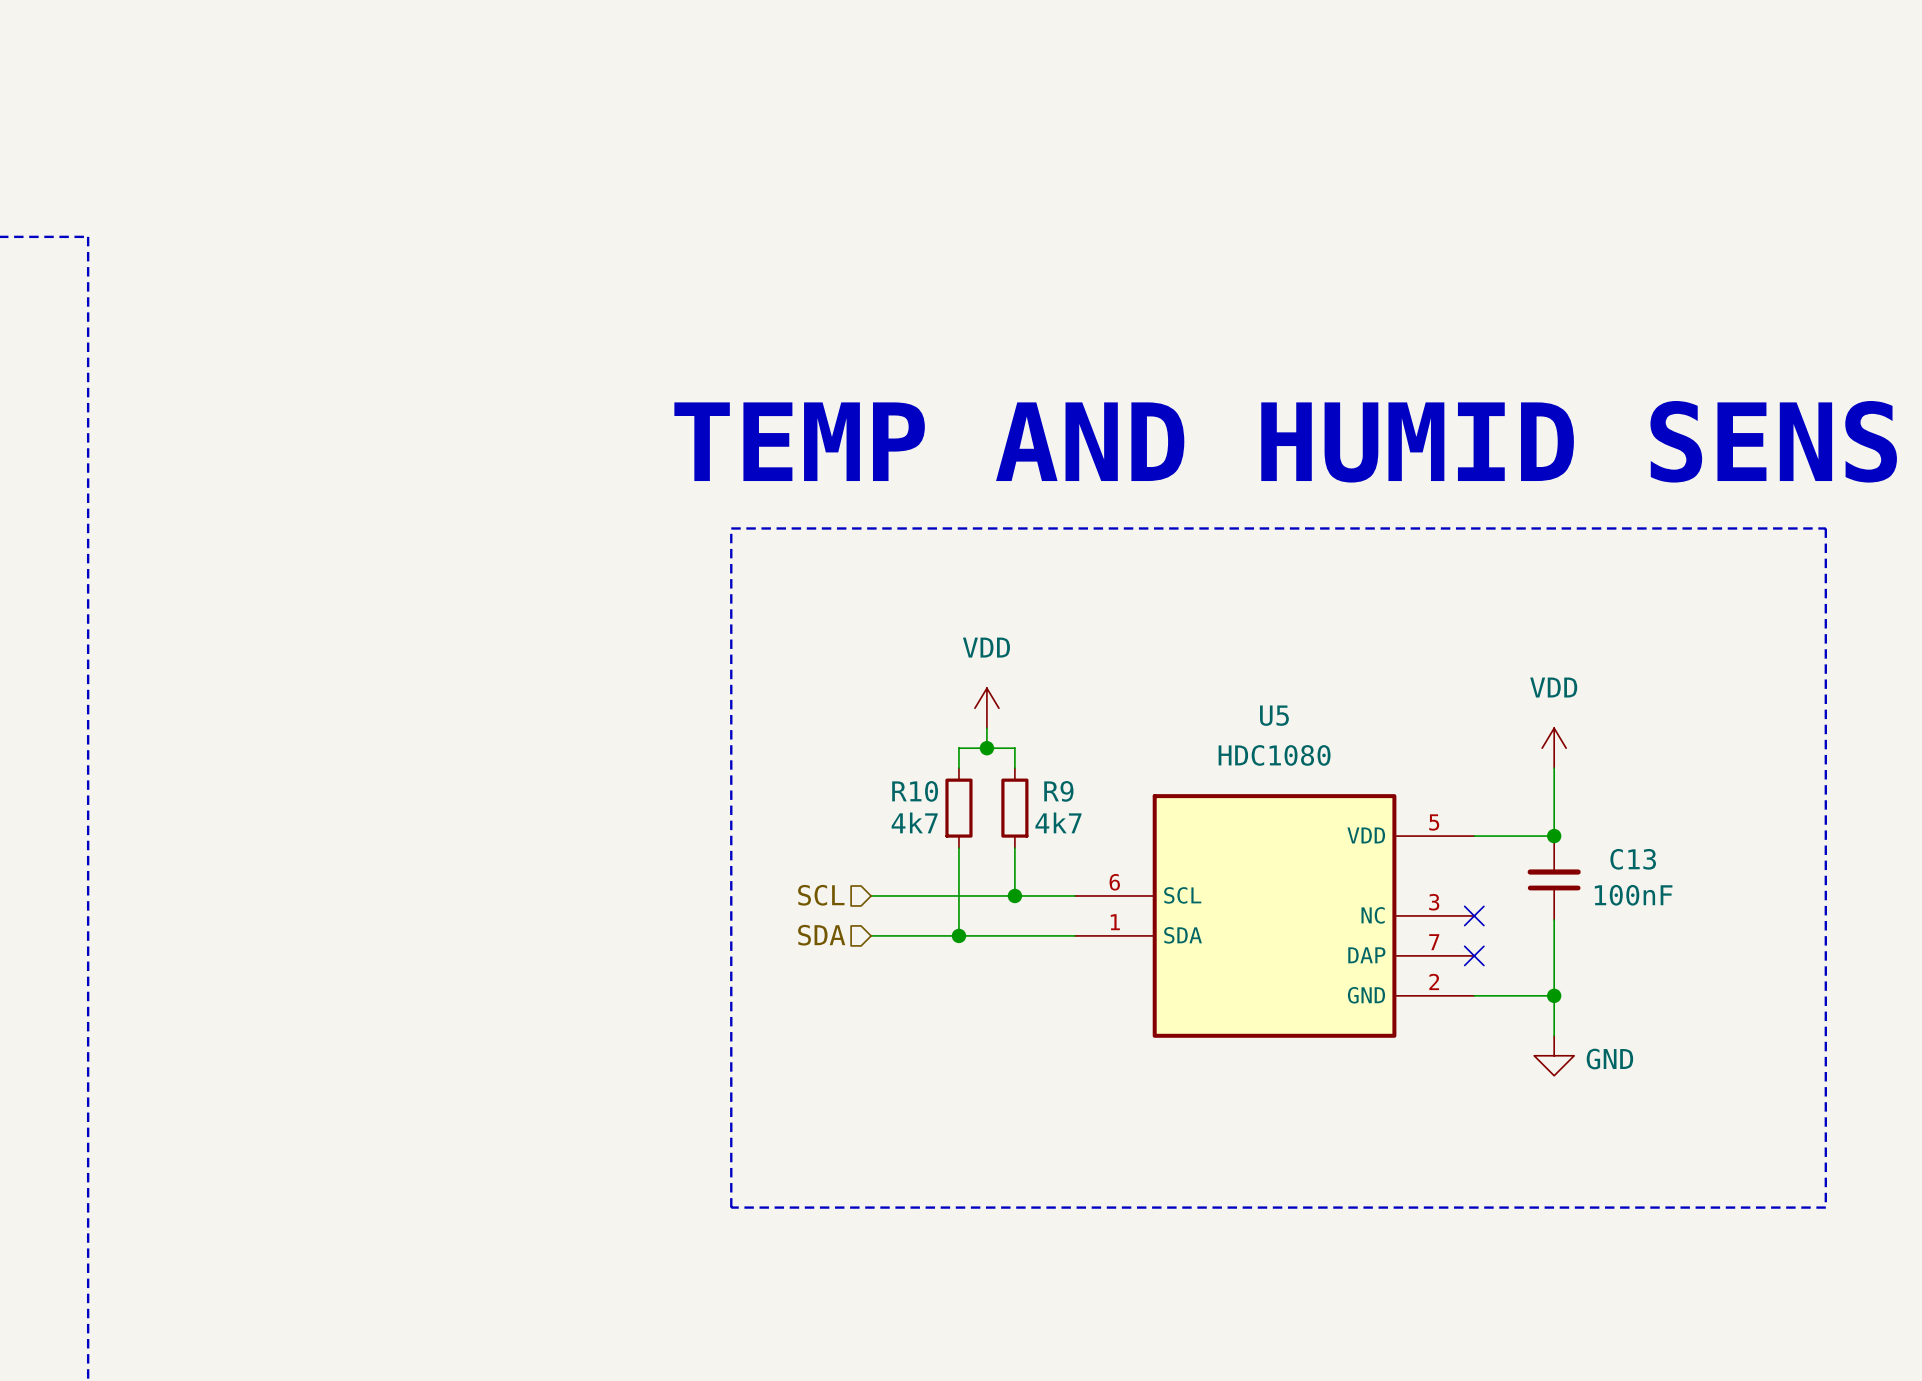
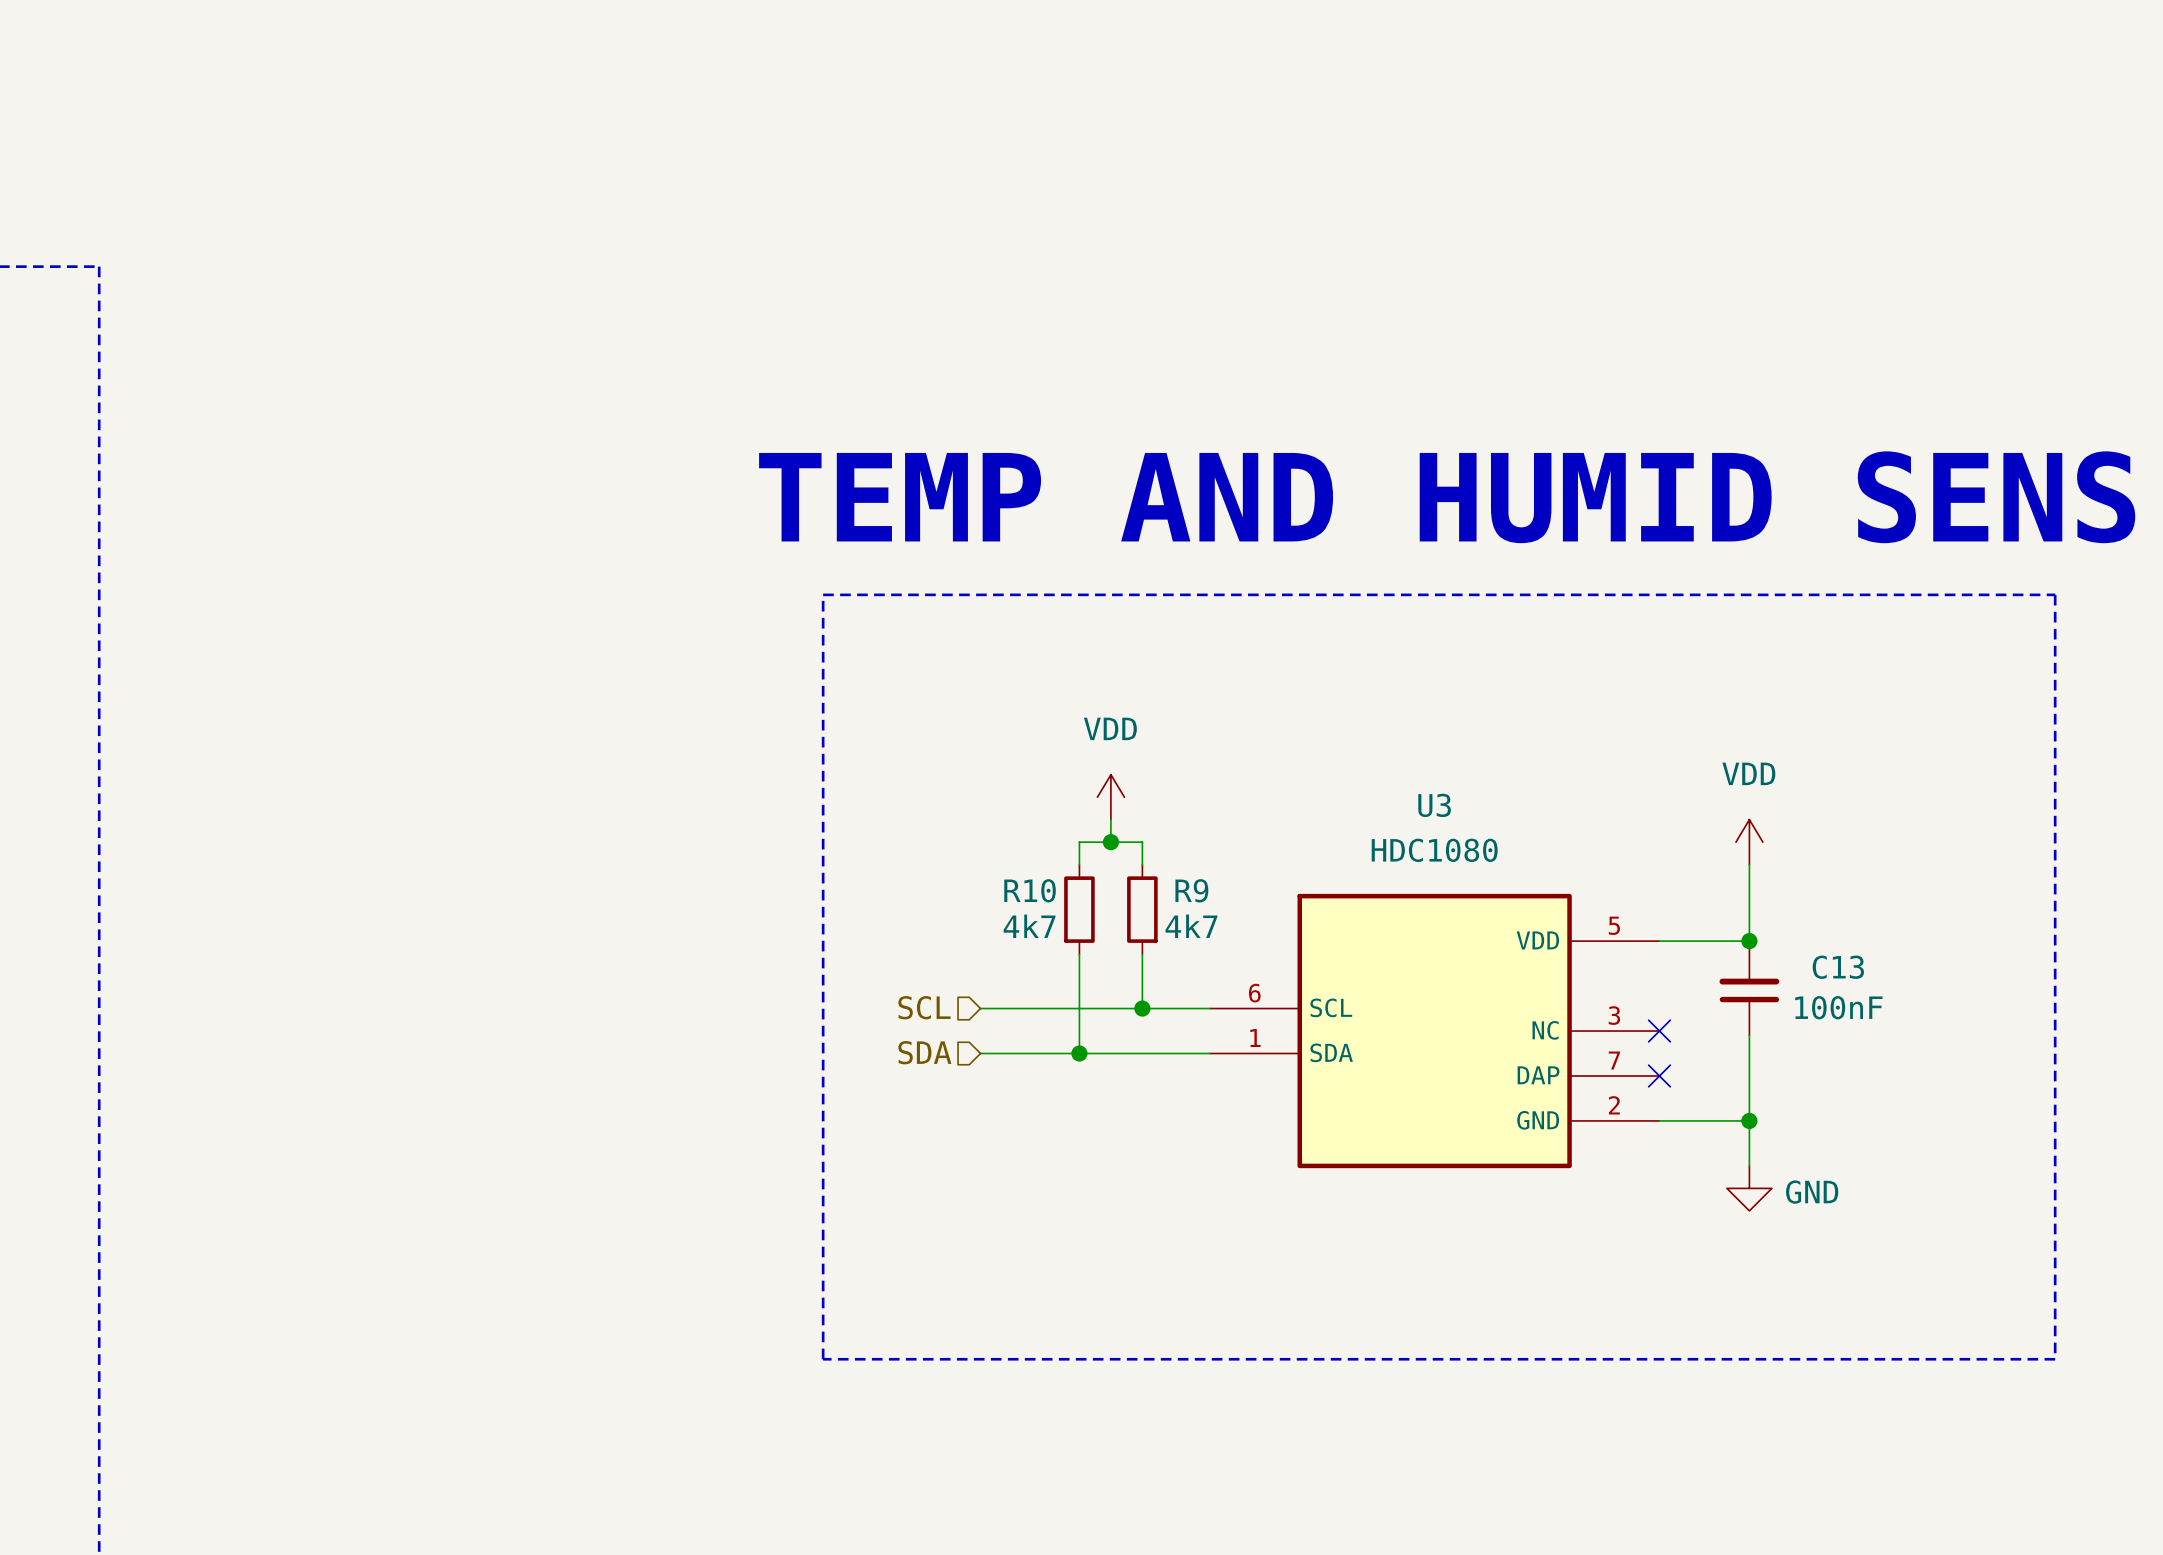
U5 name: U5 (1274, 715) -> U3 (1434, 805)

